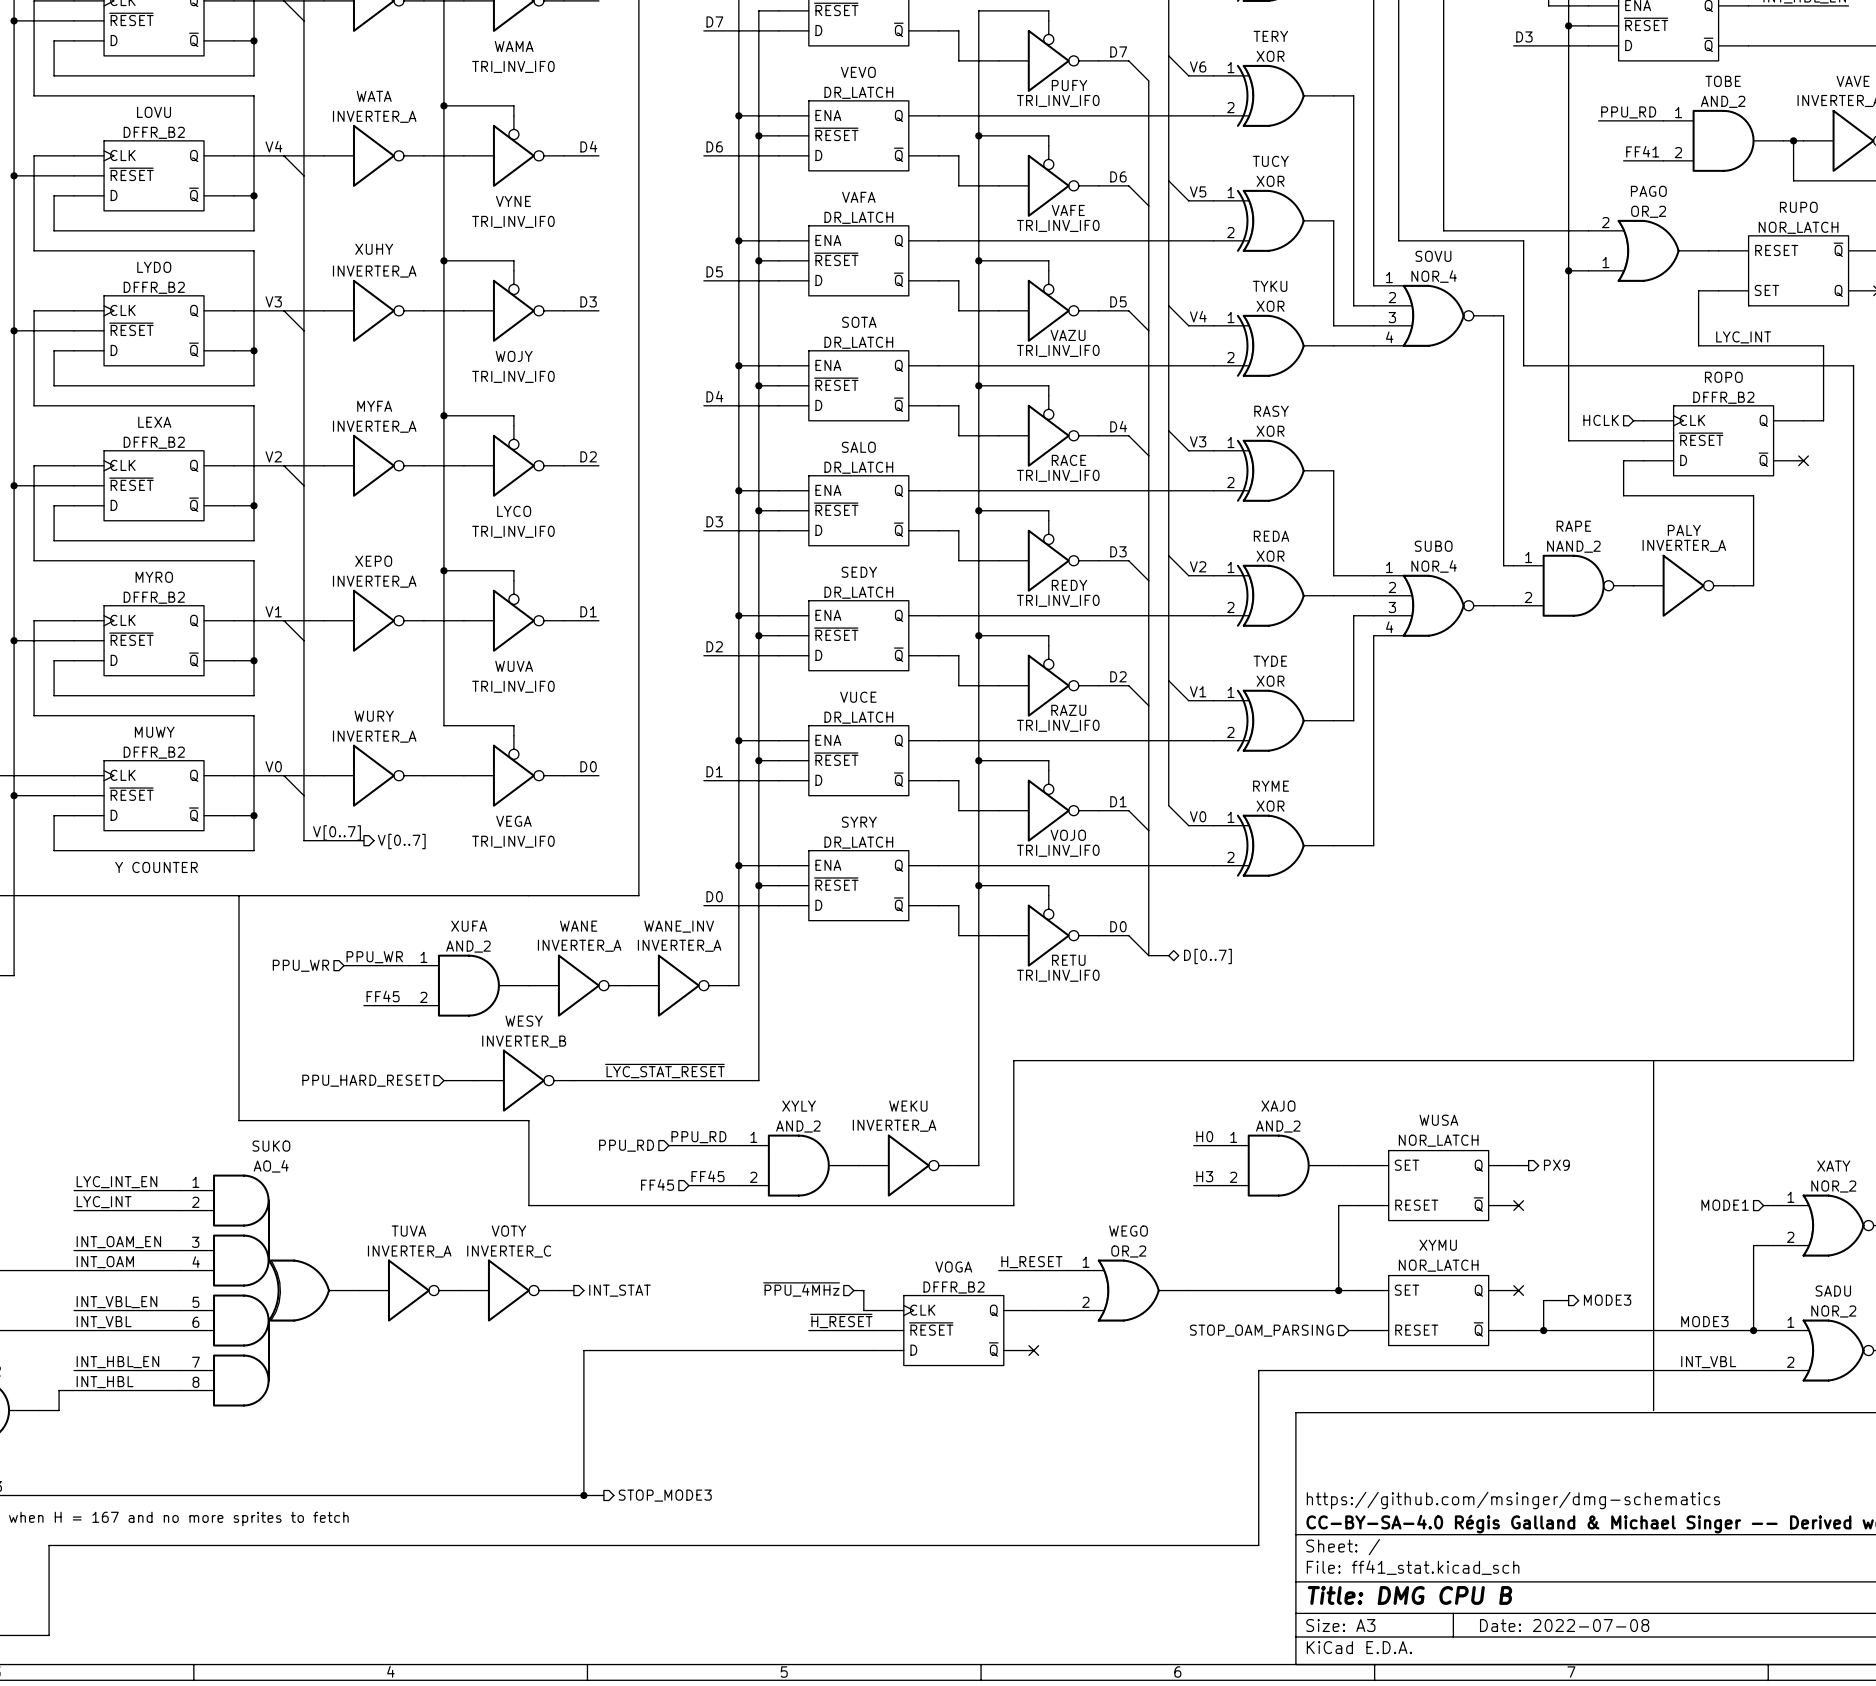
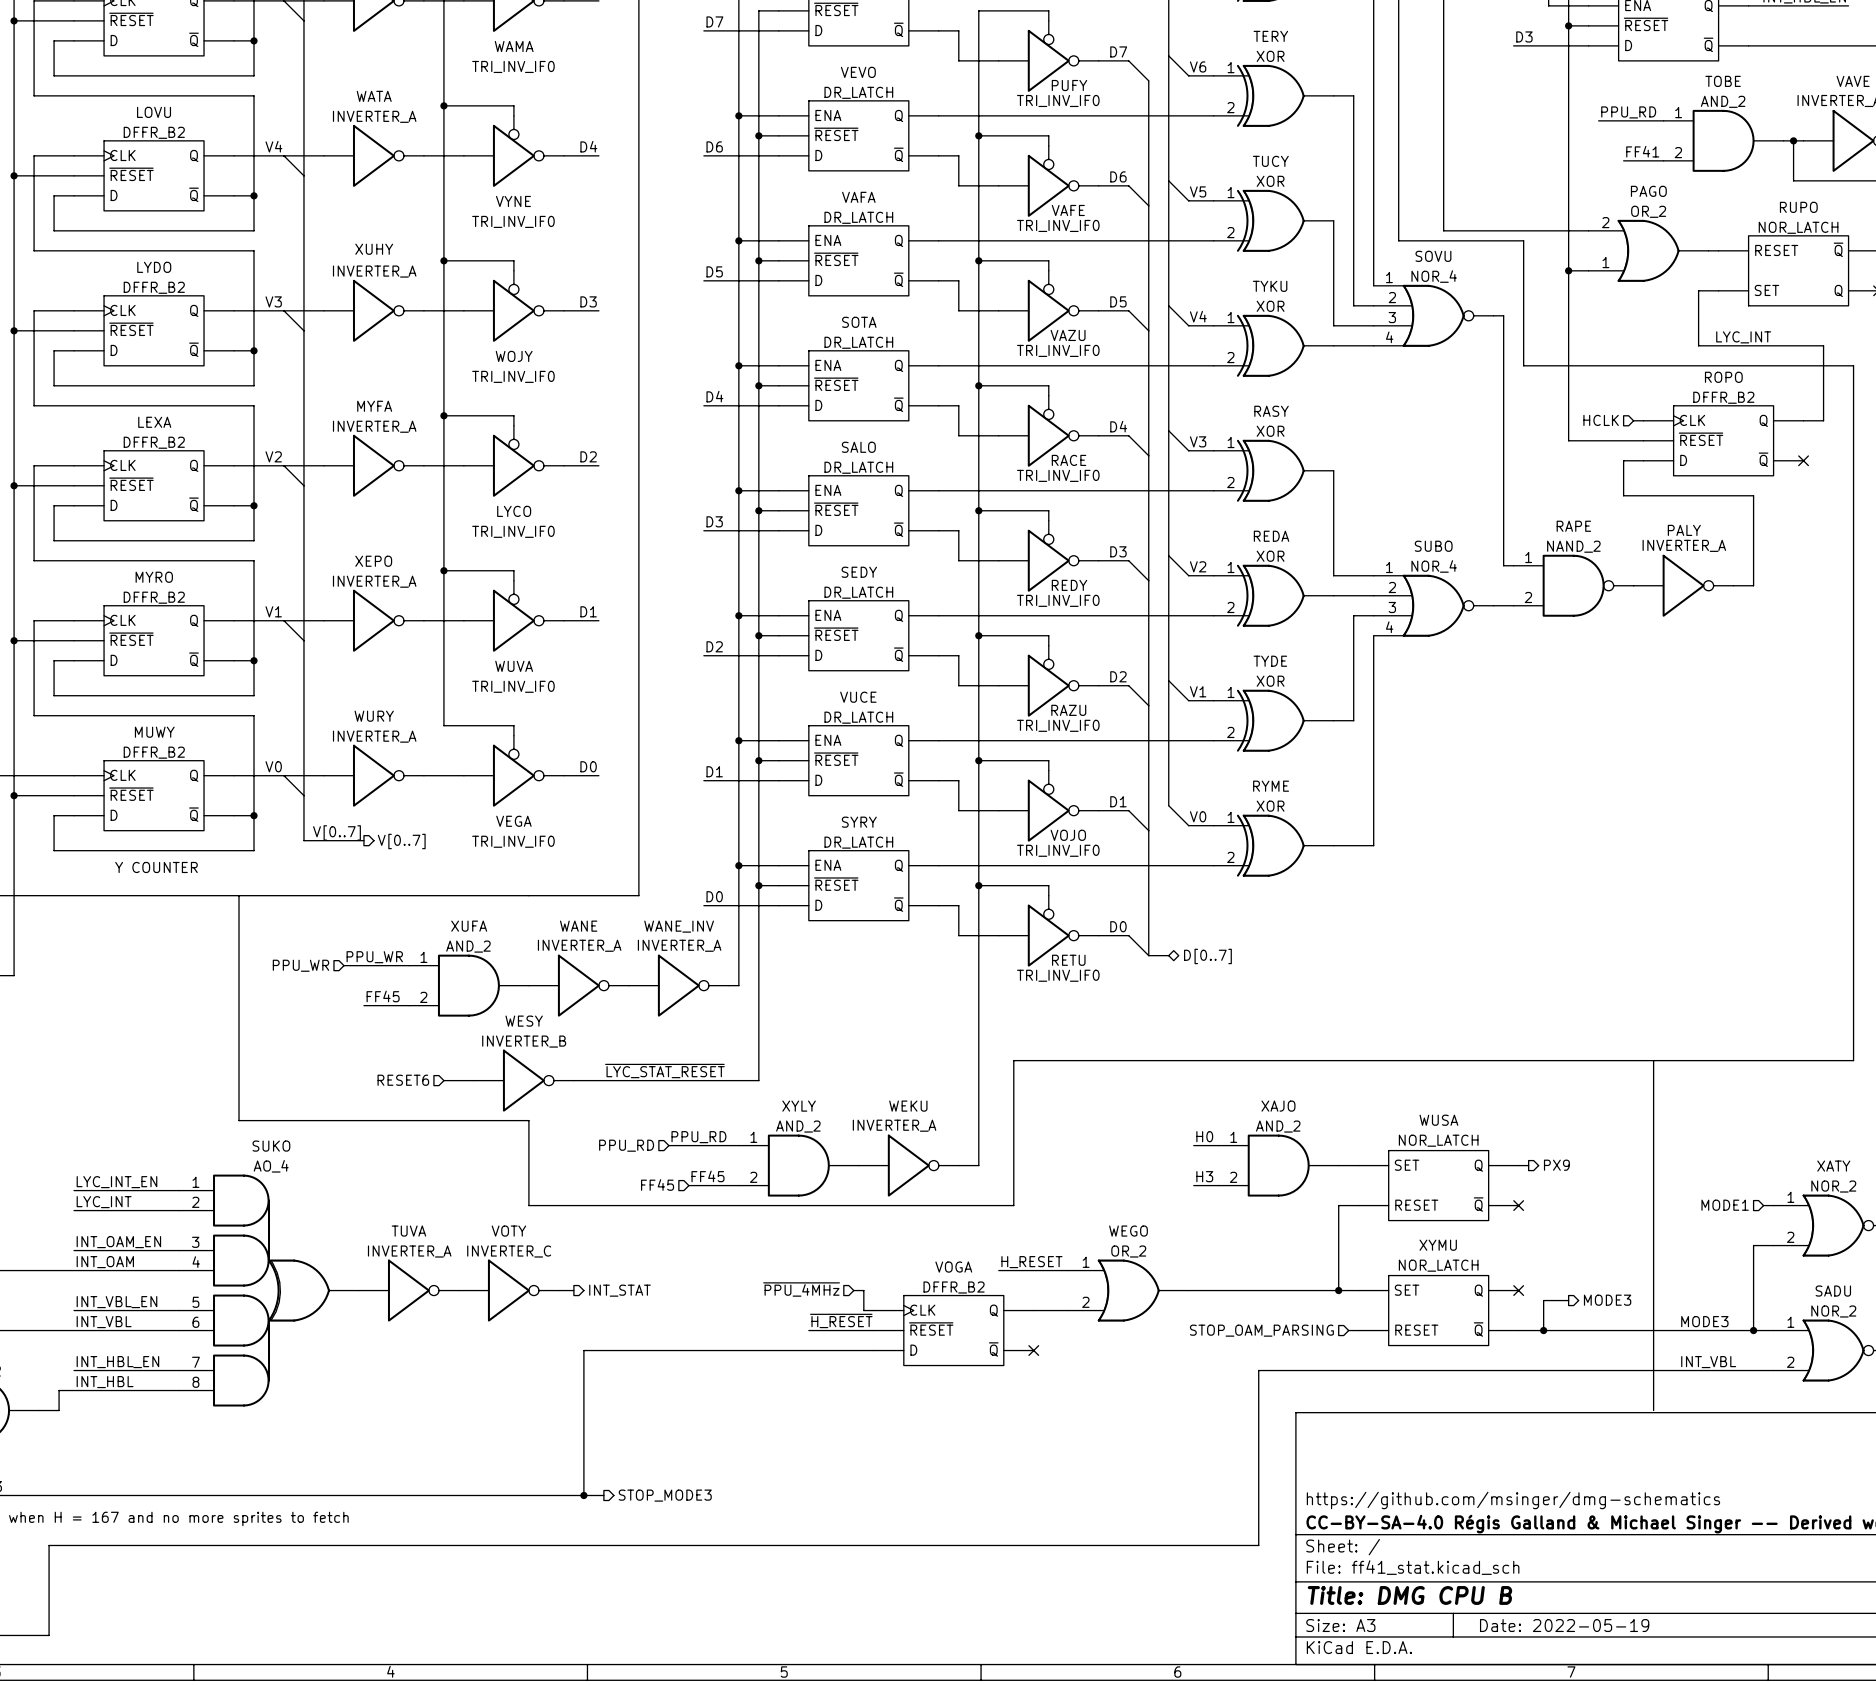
hierarchical label: PPU_HARD_RESET (366, 1080) -> RESET6 (403, 1080)
title block: Date: 2022-07-08 (1564, 1625) -> Date: 2022-05-19 (1564, 1625)

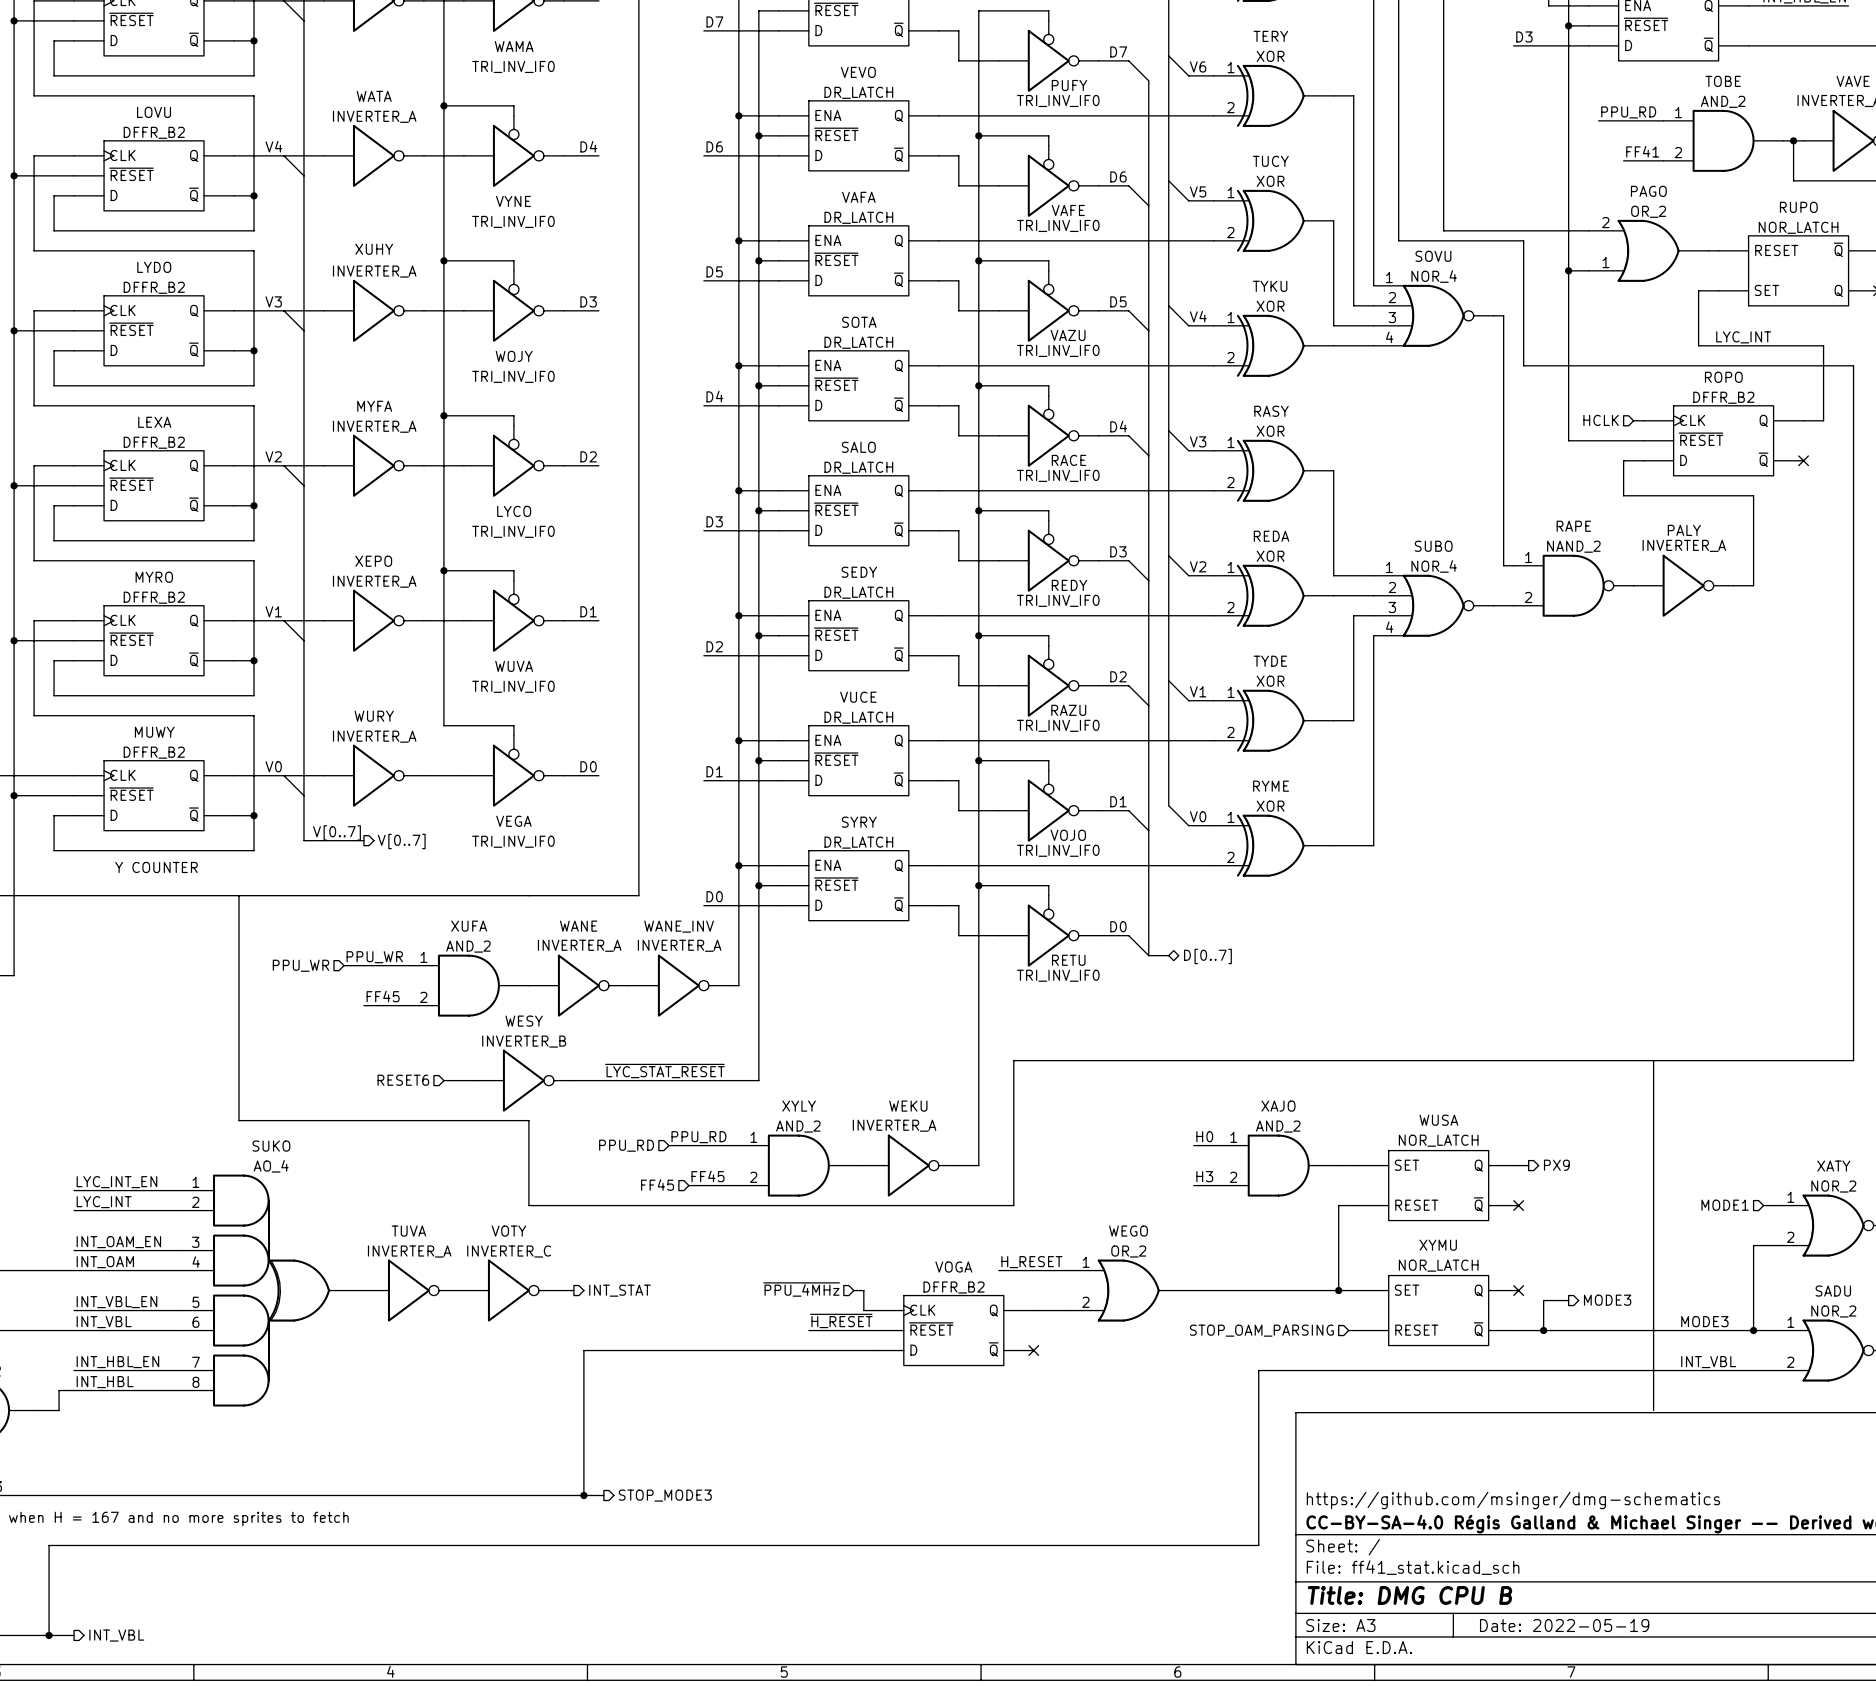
wire: none -> (49, 1635) (74, 1635)
junction: none -> (49, 1635)
hierarchical label: none -> INT_VBL (116, 1635)

